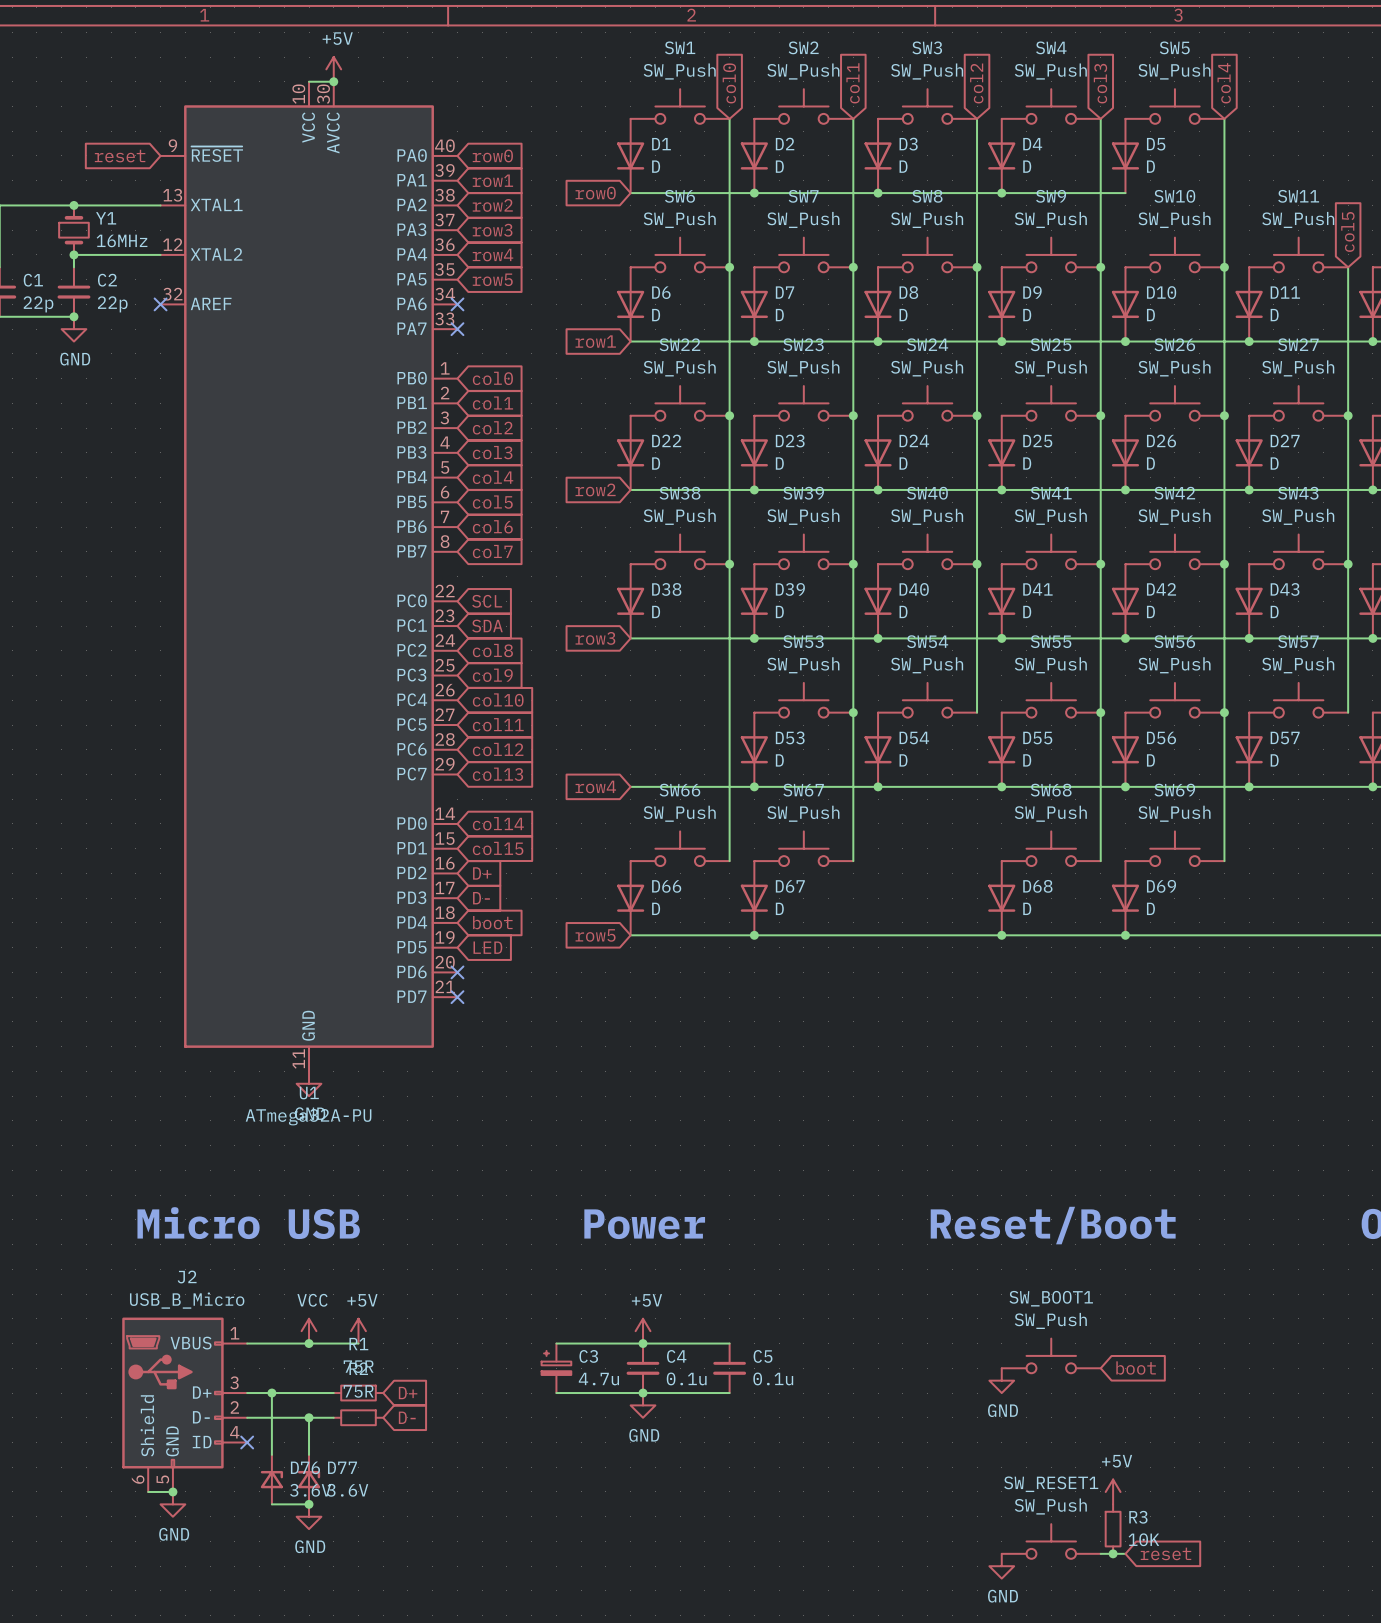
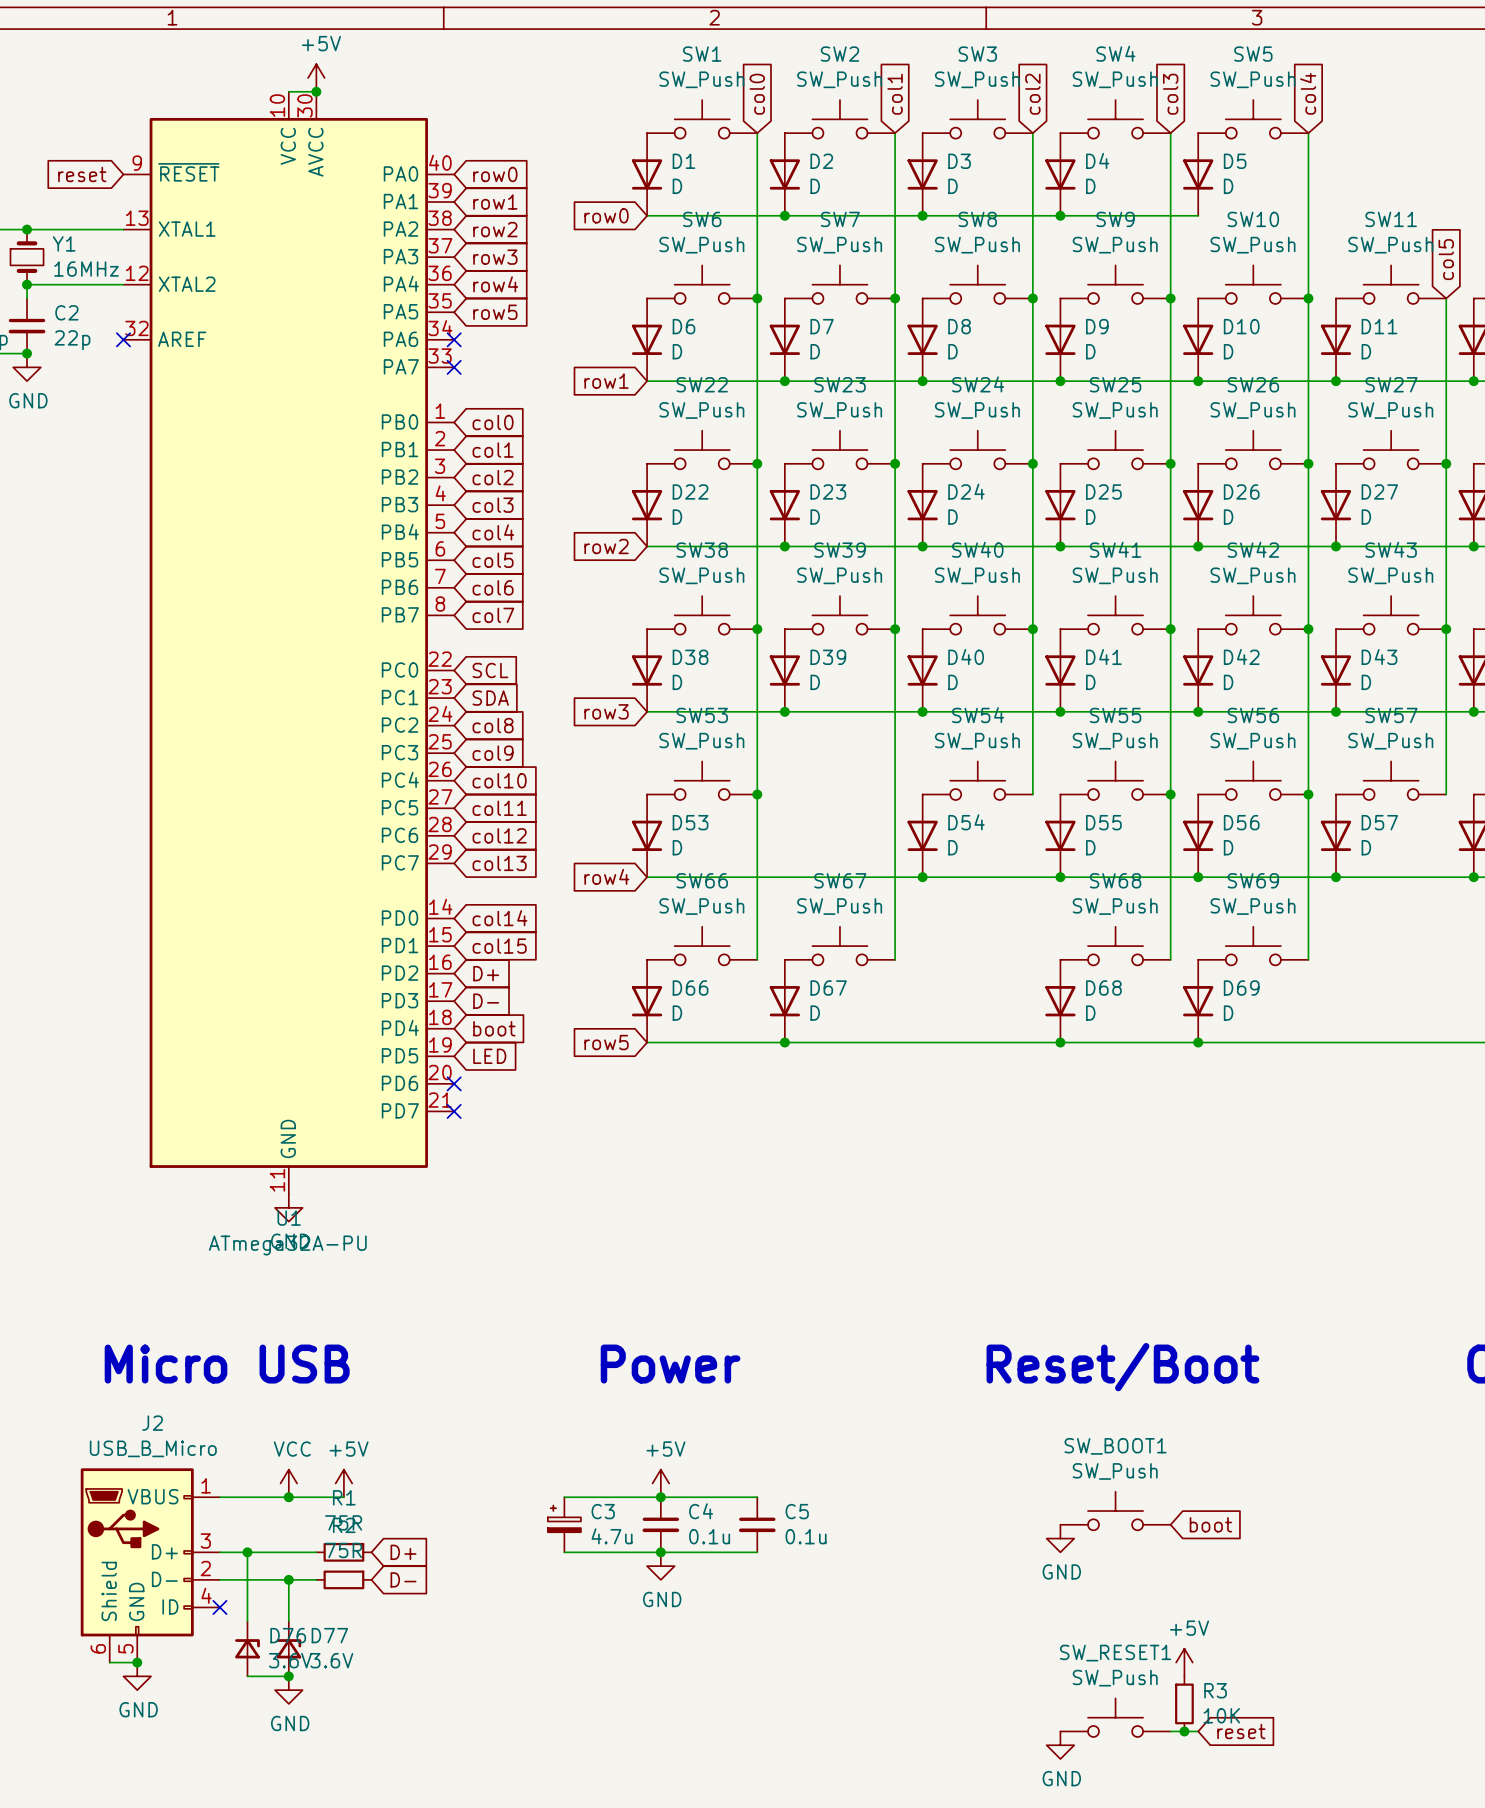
SW53 position: (803, 700) -> (702, 780)
junction: none -> (757, 794)
junction: (853, 712) -> none
D53 position: (754, 749) -> (647, 835)
junction: (754, 786) -> none

